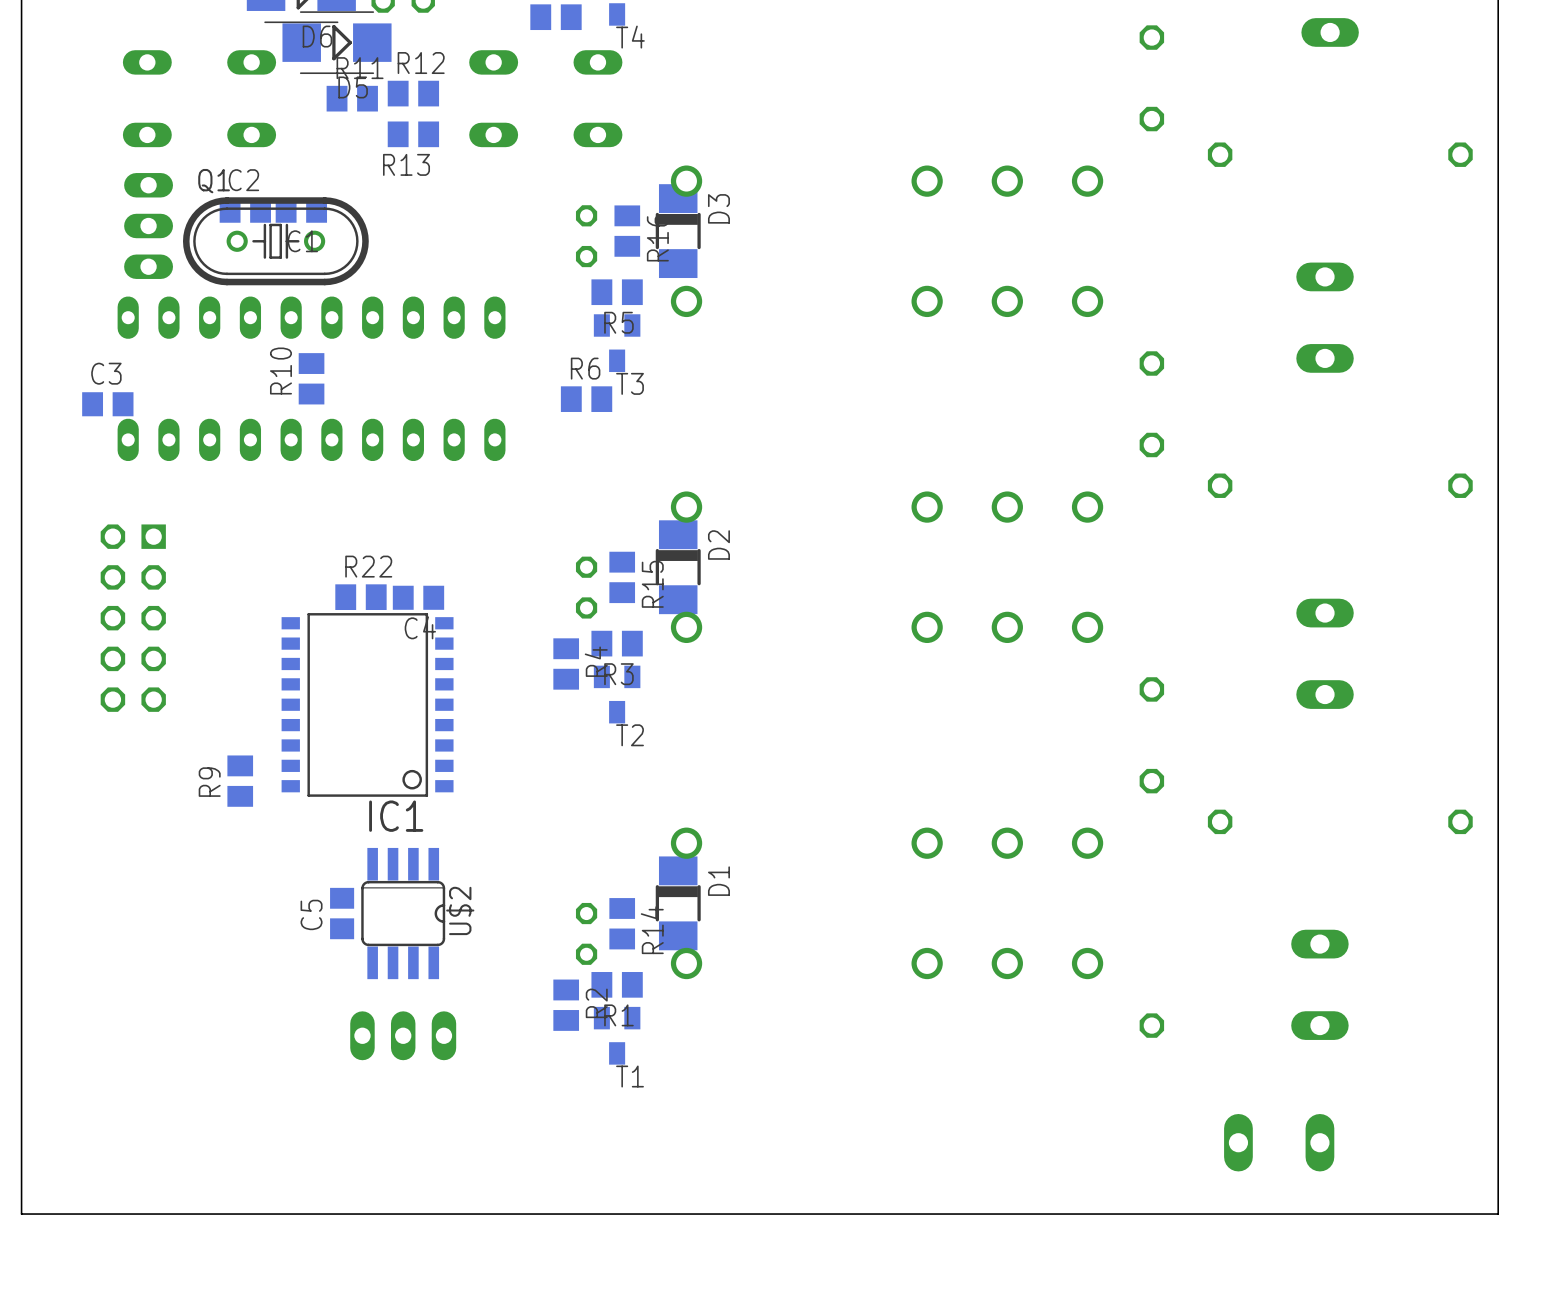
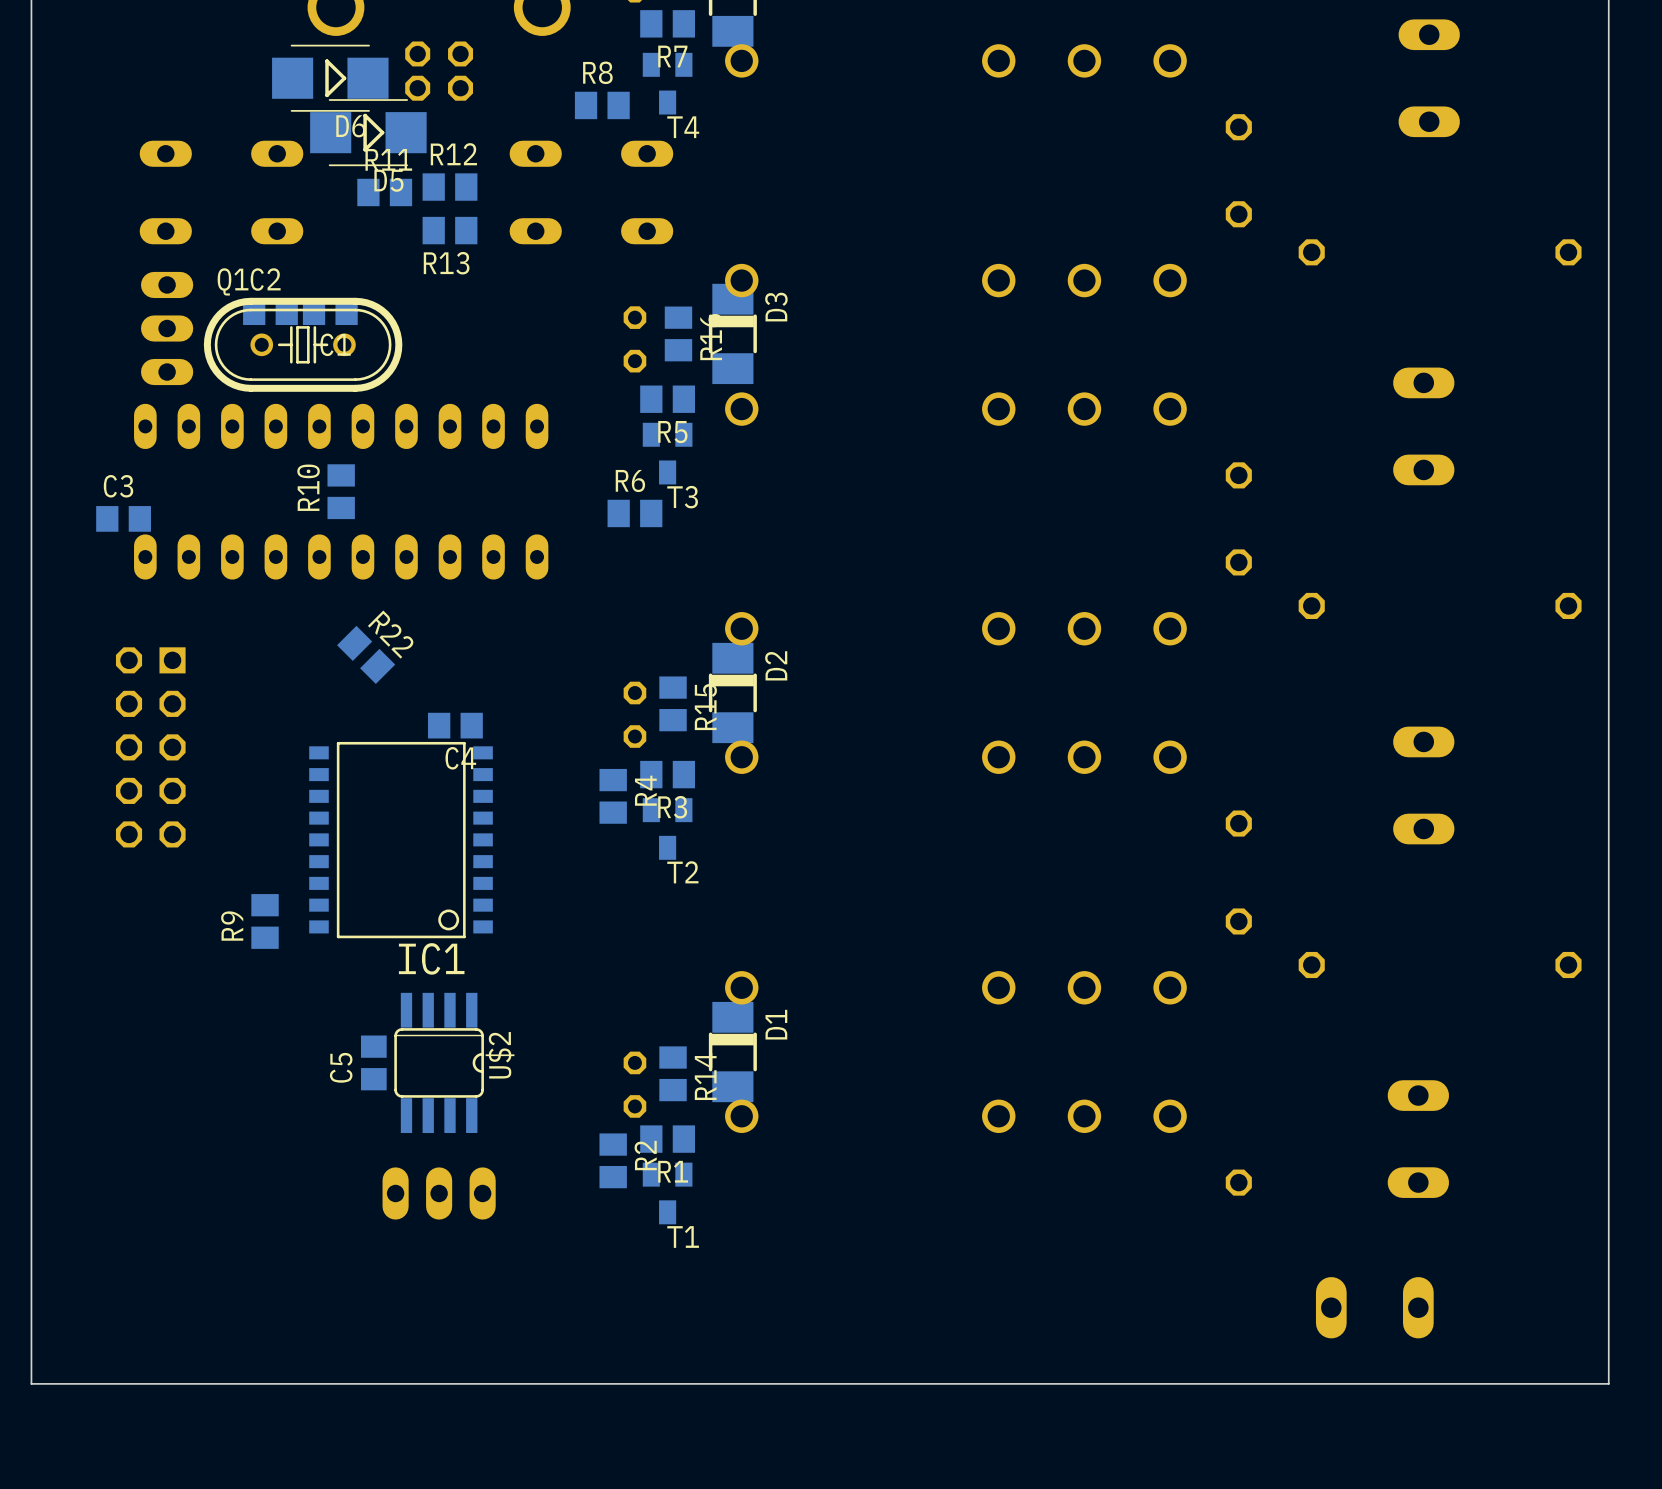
R22 rotation: 0° (360, 597) -> 45° clockwise (366, 654)
R22 position: (360, 597) -> (366, 654)

